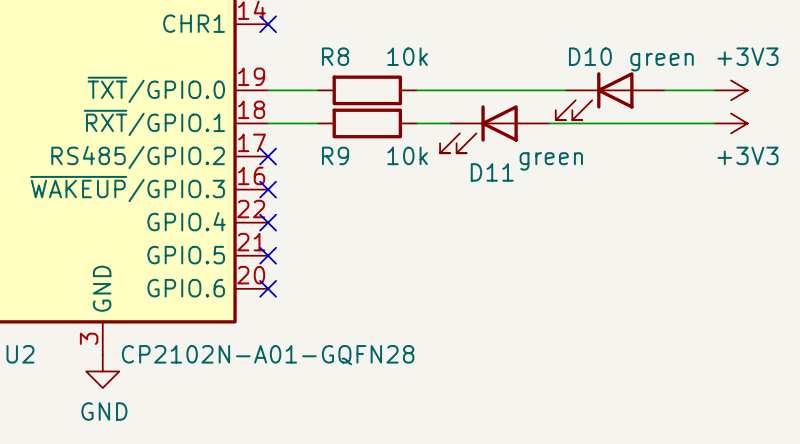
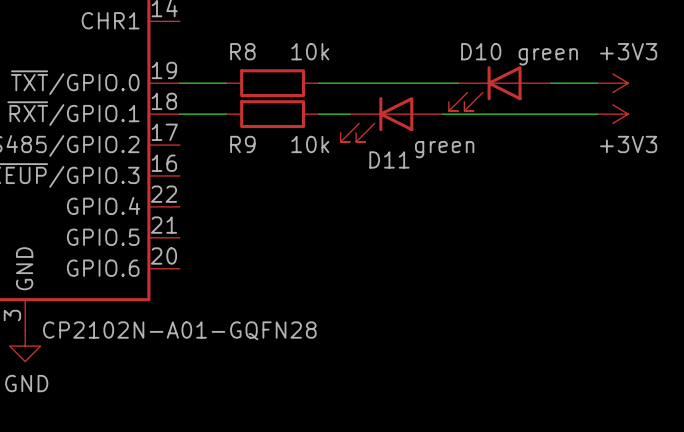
no-connect mark: (268, 24) -> none
no-connect mark: (268, 156) -> none
no-connect mark: (268, 189) -> none
no-connect mark: (268, 222) -> none
no-connect mark: (268, 255) -> none
no-connect mark: (268, 288) -> none

